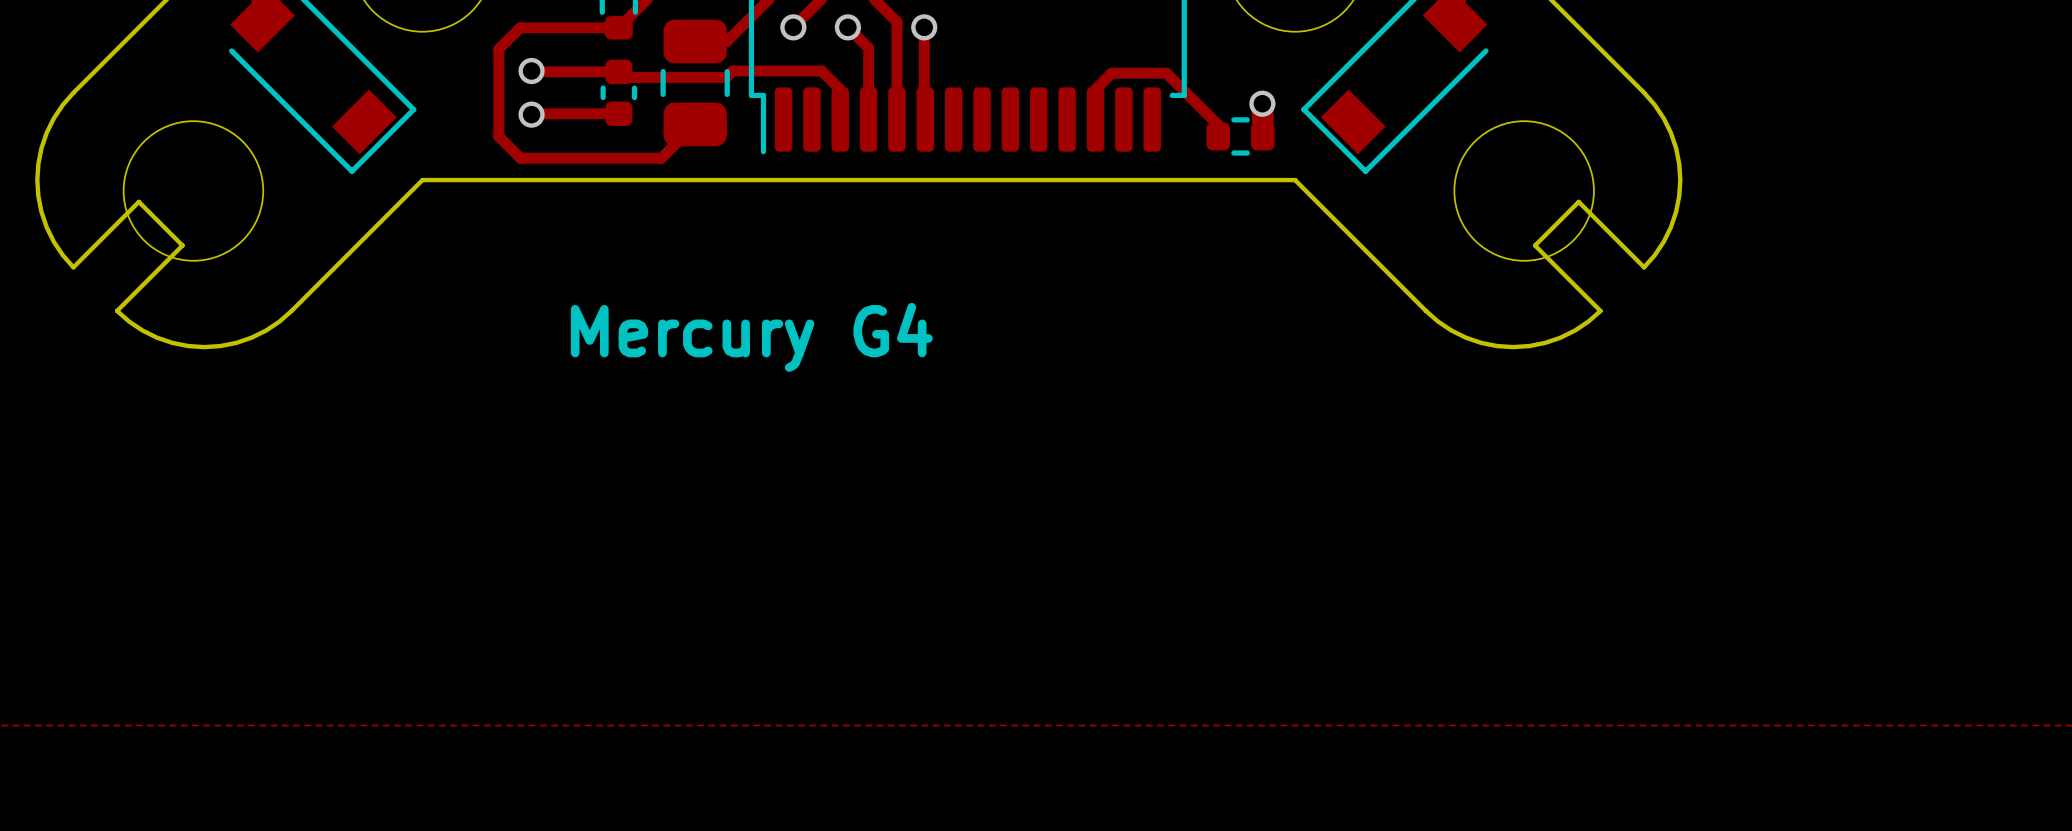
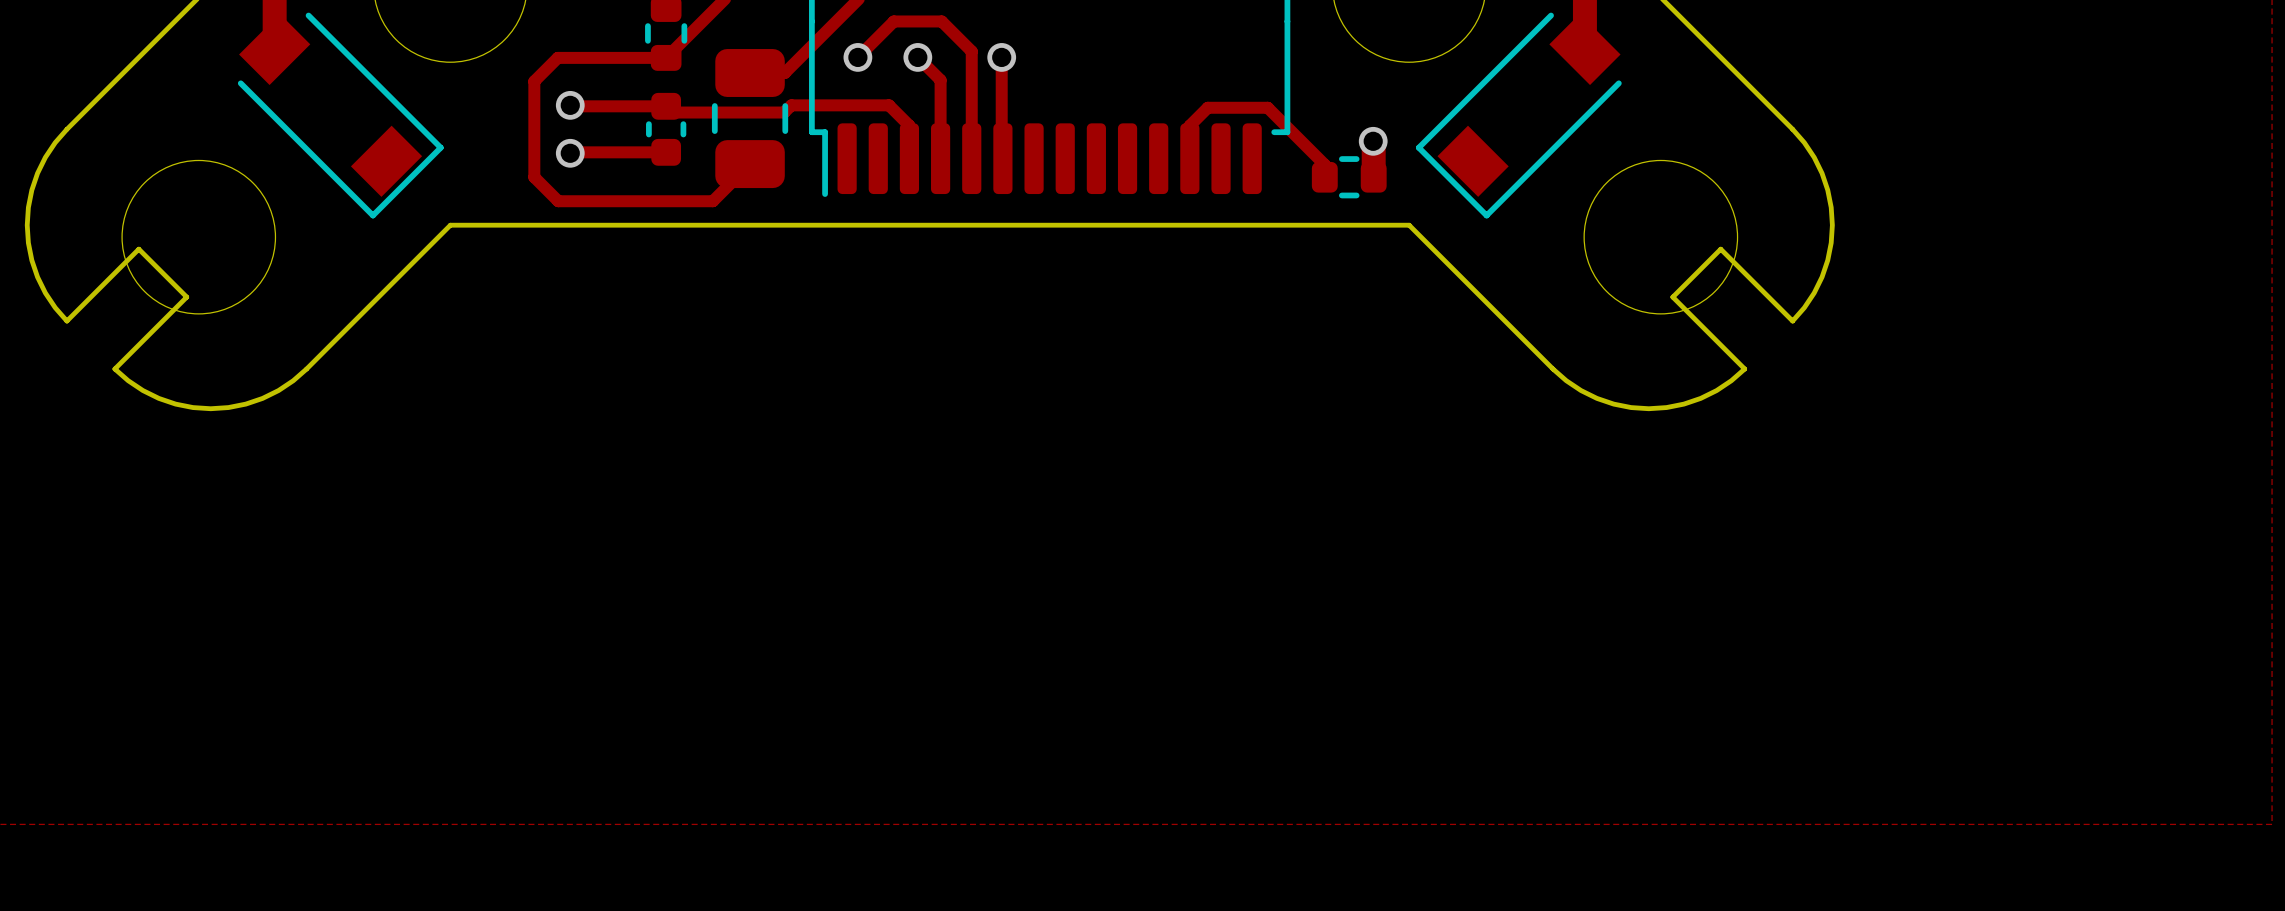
text: Mercury G4 (751, 337) -> none

